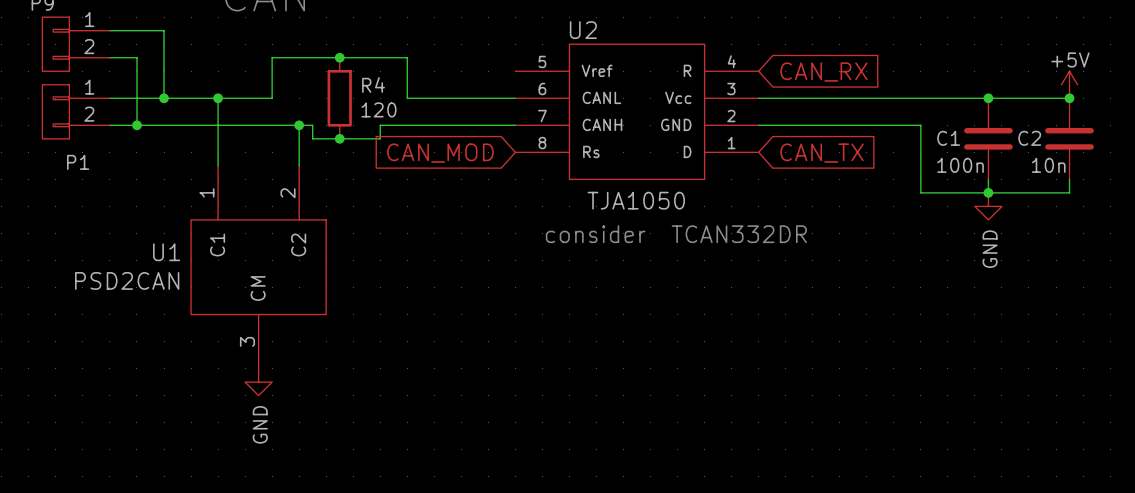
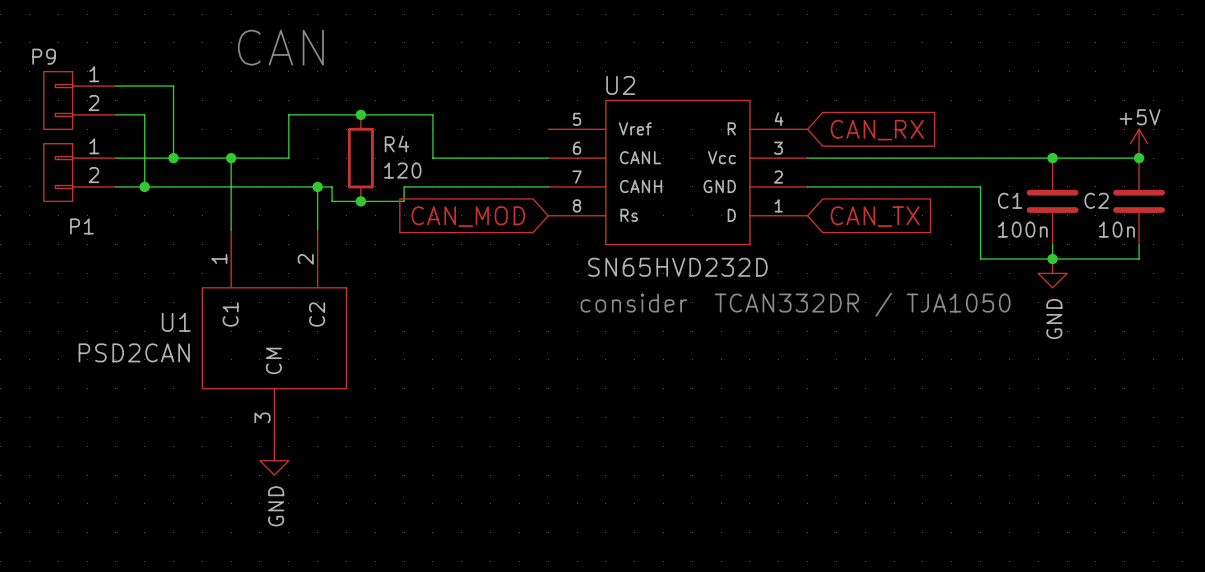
U2 value: TJA1050 (636, 200) -> SN65HVD232D (677, 267)
text: consider TCAN332DR (676, 234) -> consider TCAN332DR / TJA1050 (795, 304)

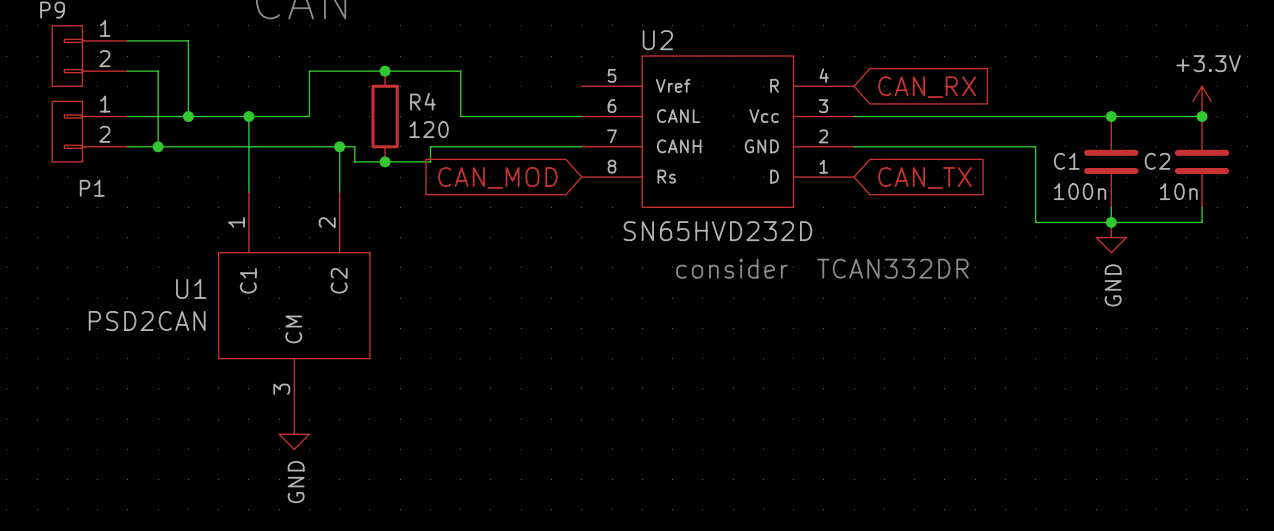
power symbol: +5V (1139, 143) -> +3.3V (1202, 101)
text: consider TCAN332DR / TJA1050 (795, 304) -> consider TCAN332DR (822, 268)

